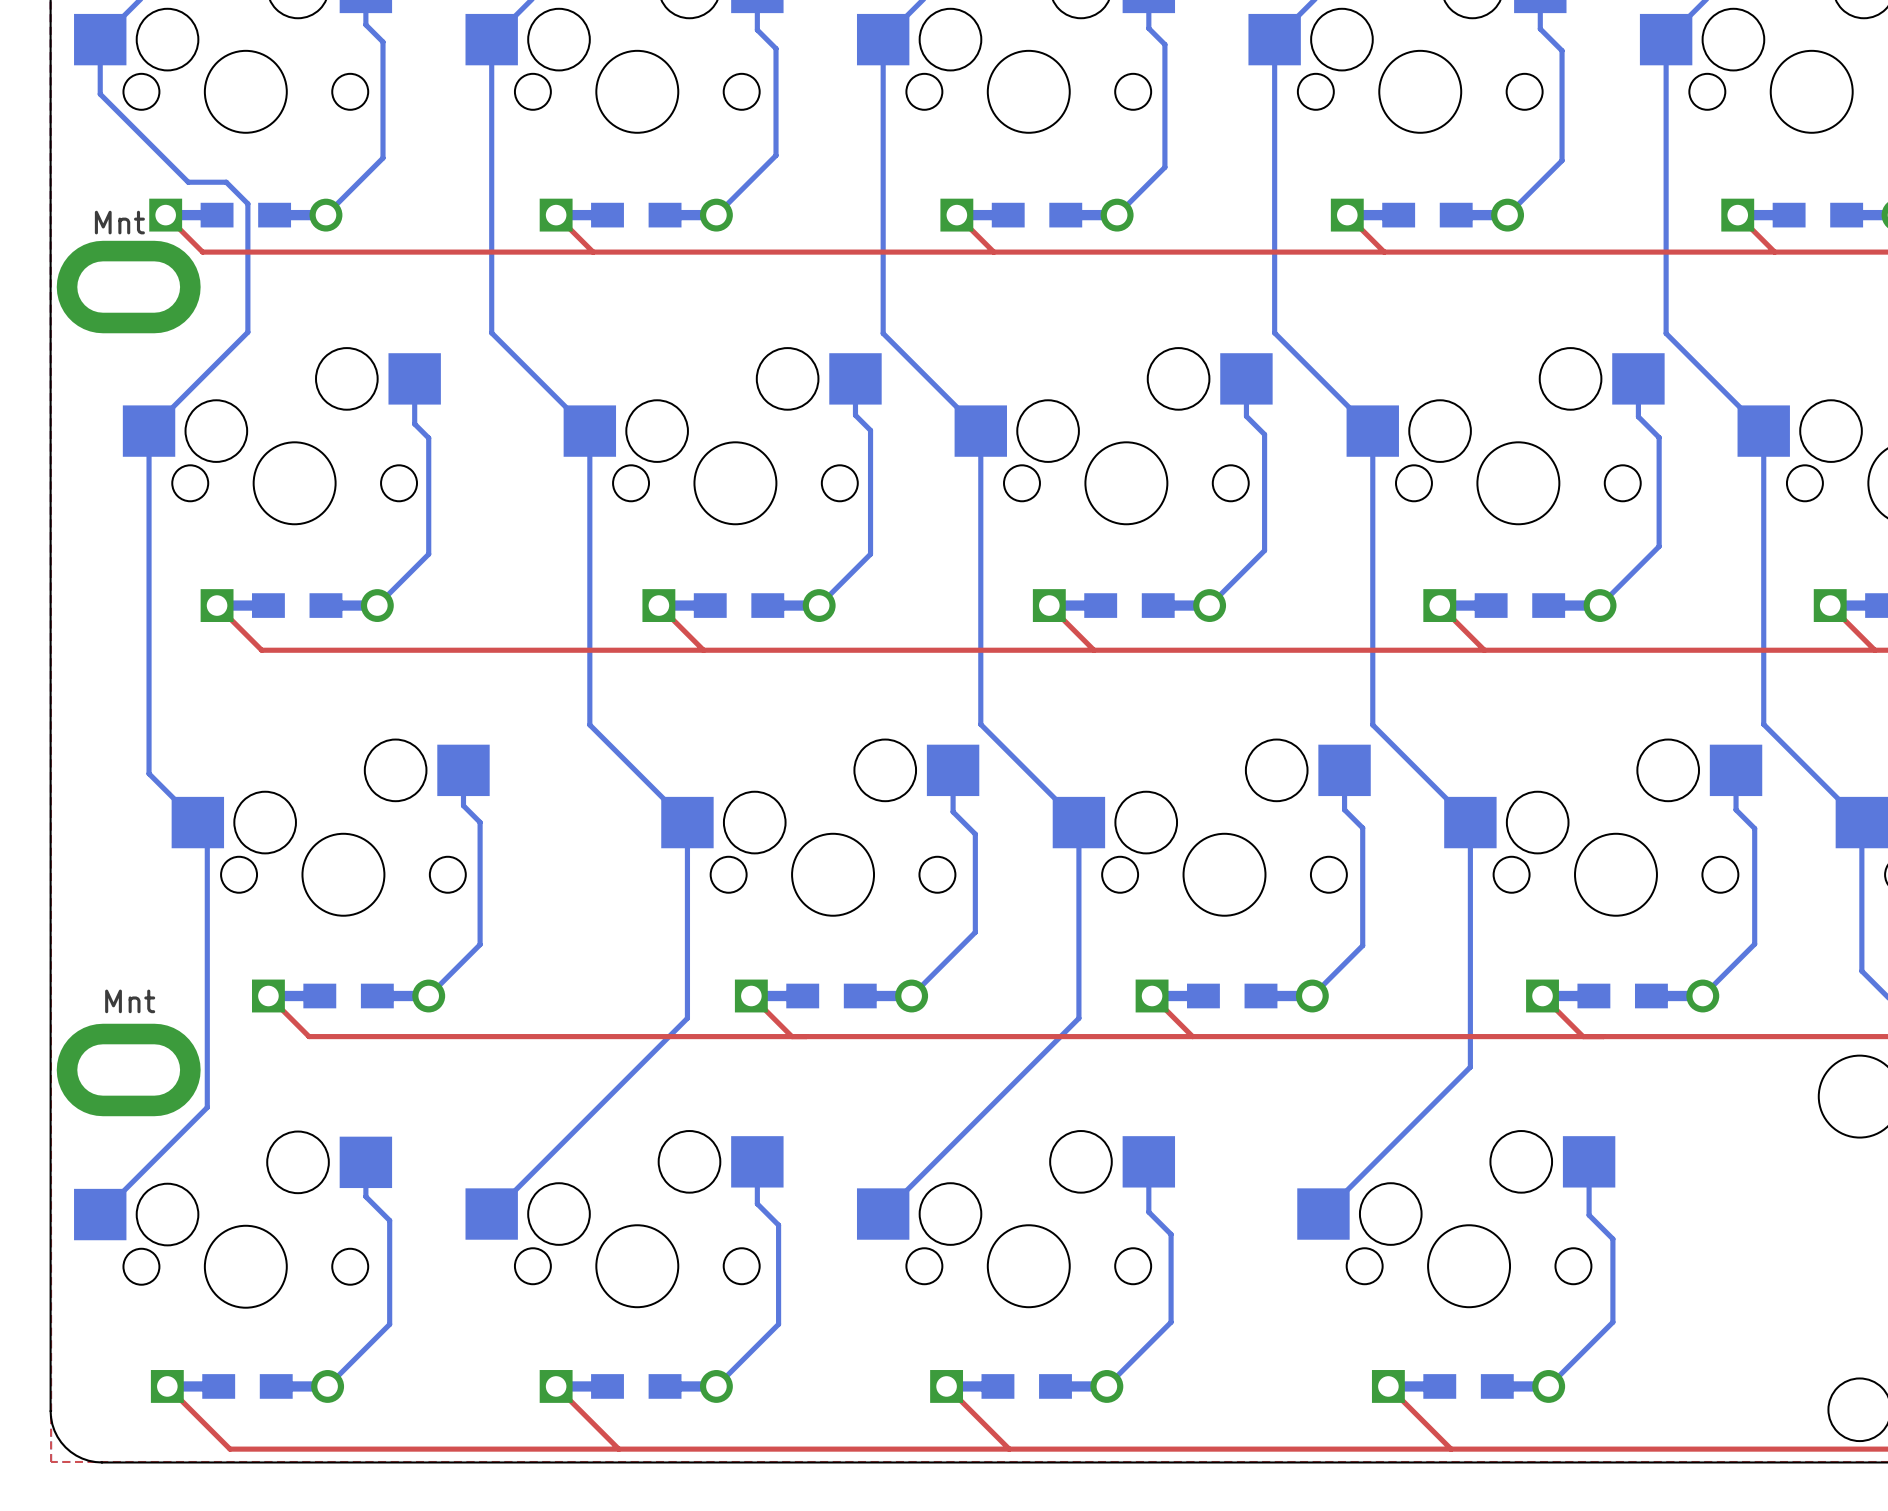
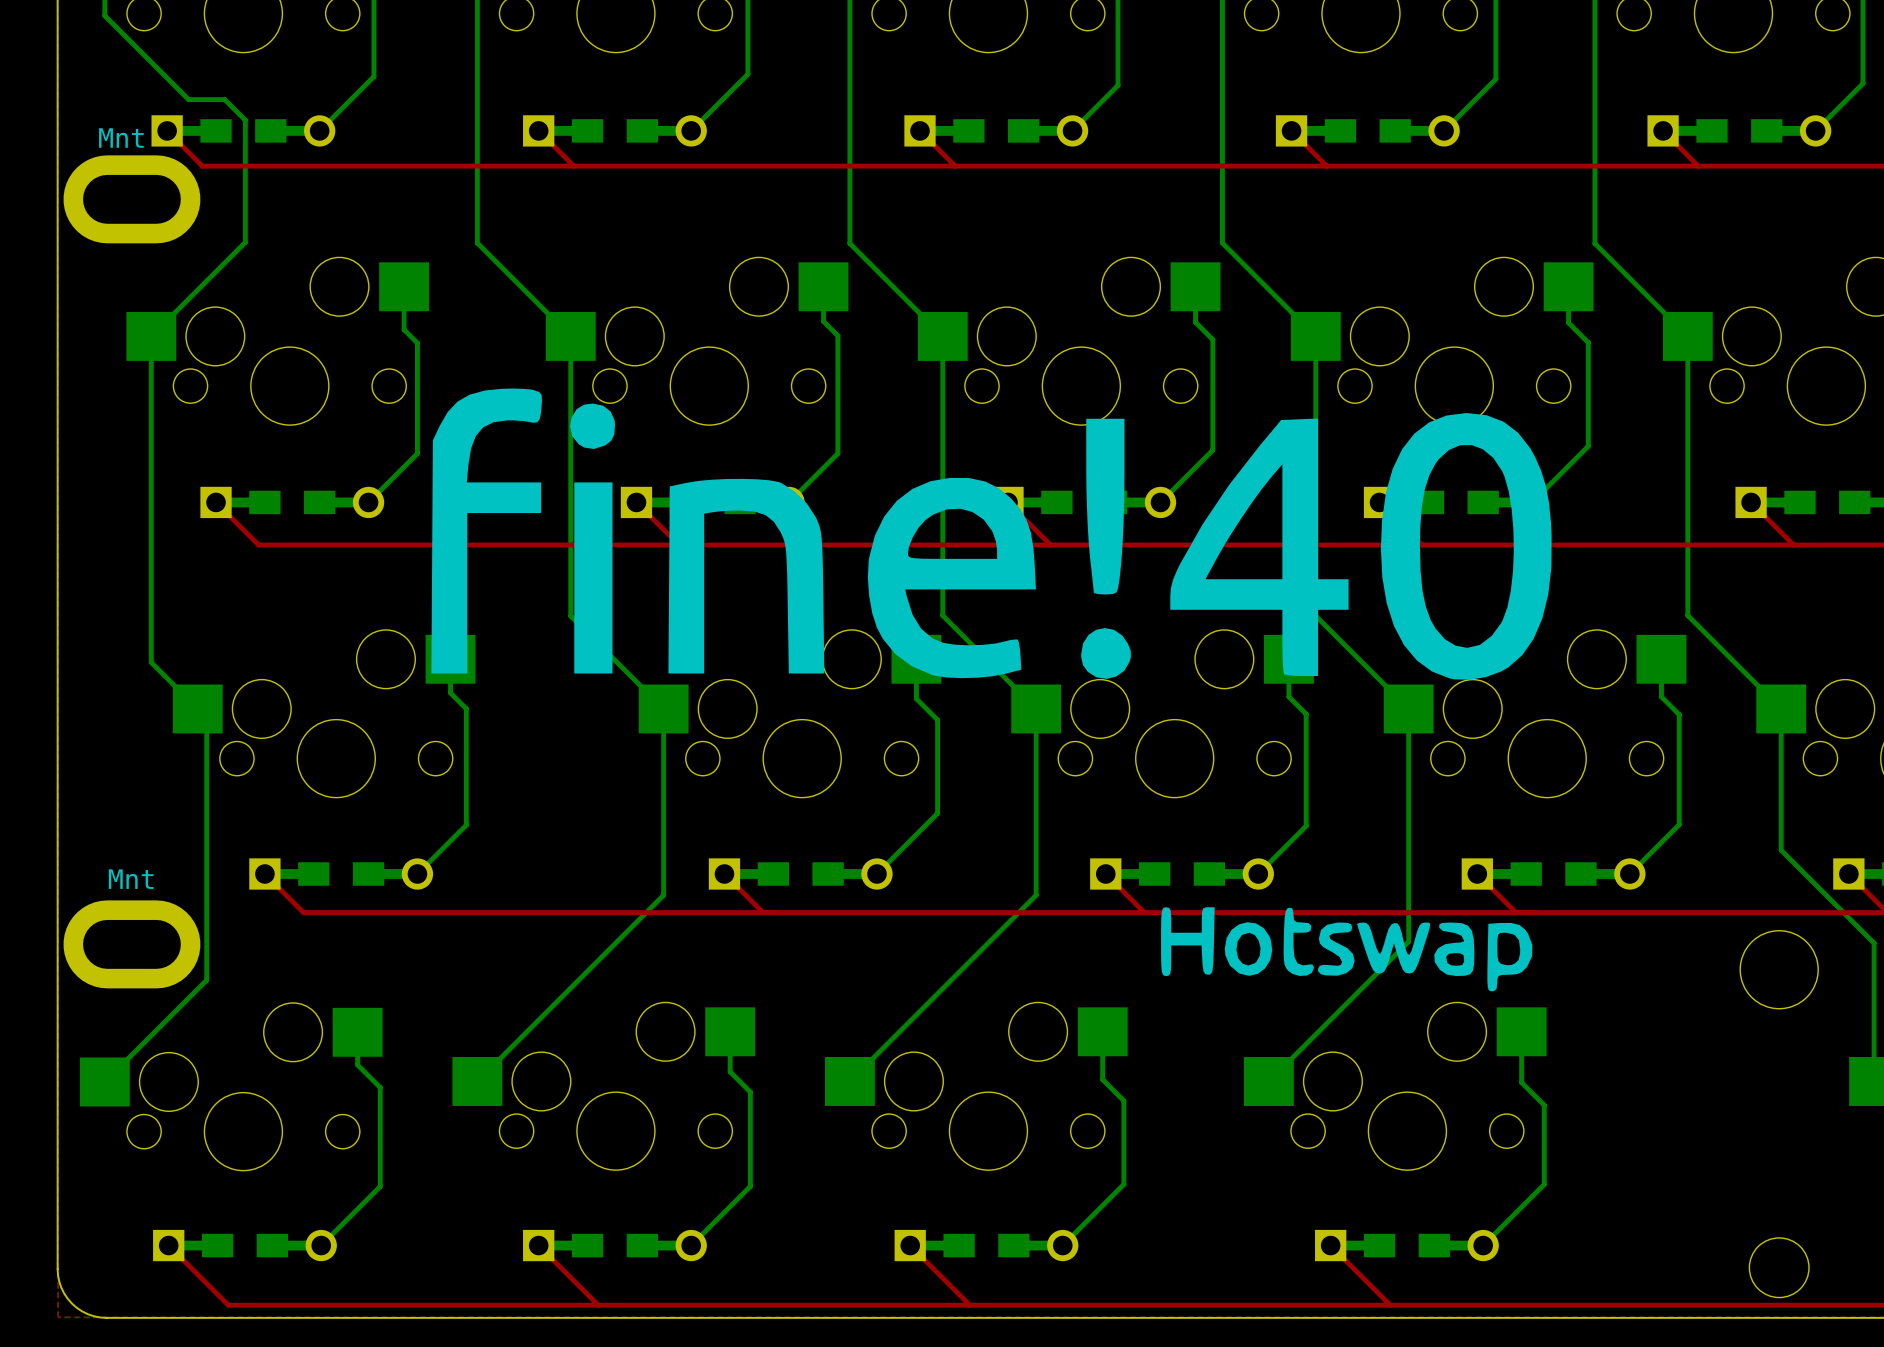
drawing: none -> [431, 388, 1552, 680]
drawing: none -> [1161, 907, 1533, 992]

